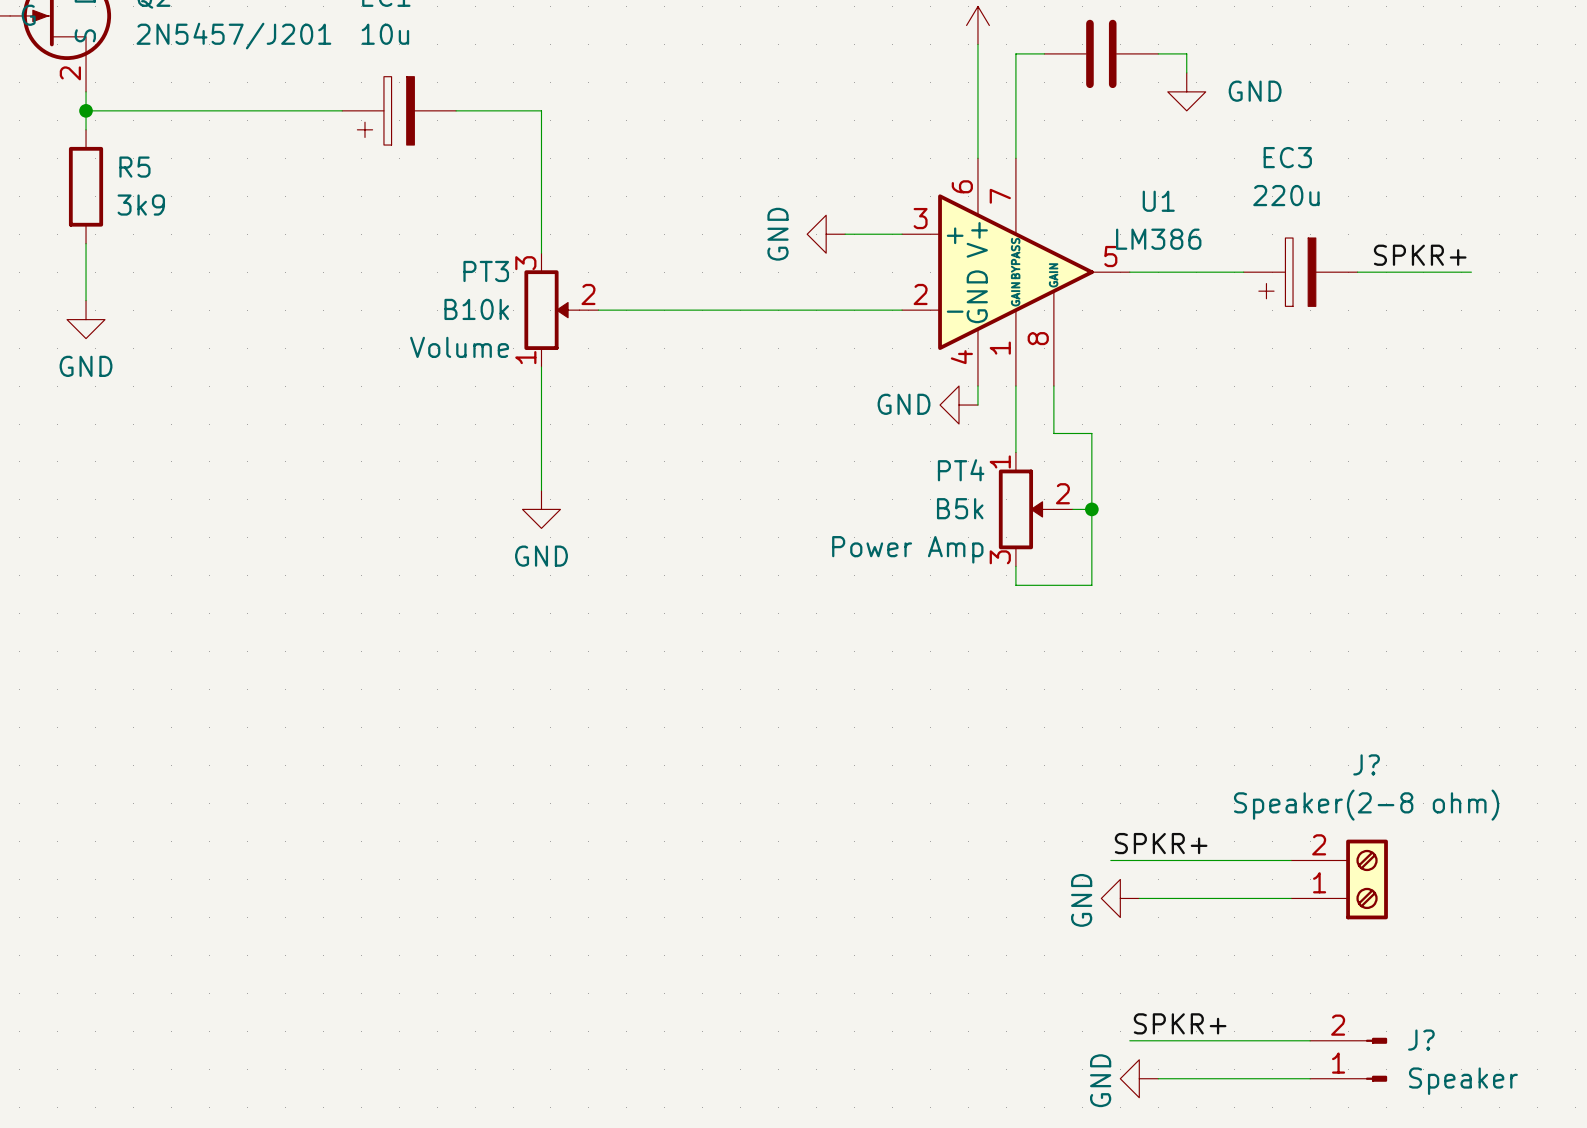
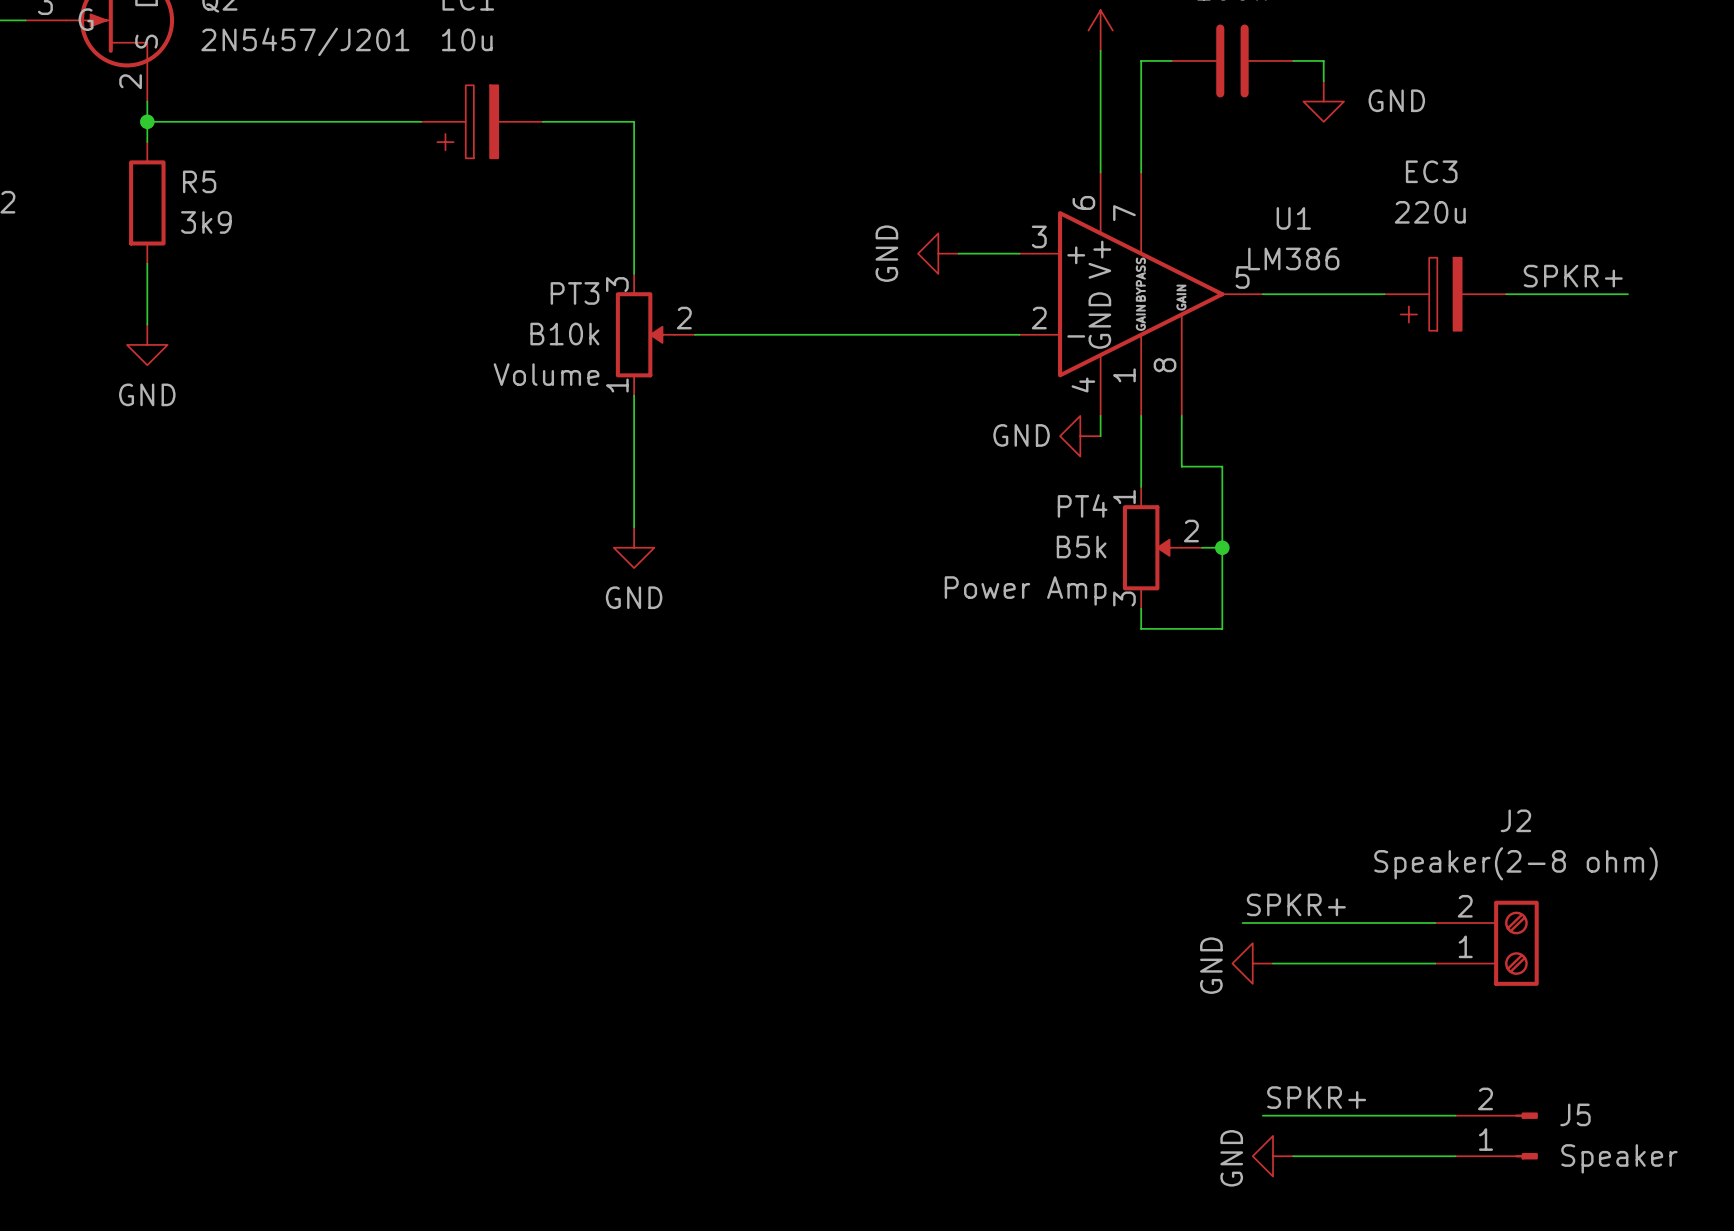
J? name: J? (1366, 764) -> J2 (1515, 820)
J? name: J? (1421, 1040) -> J5 (1575, 1114)

